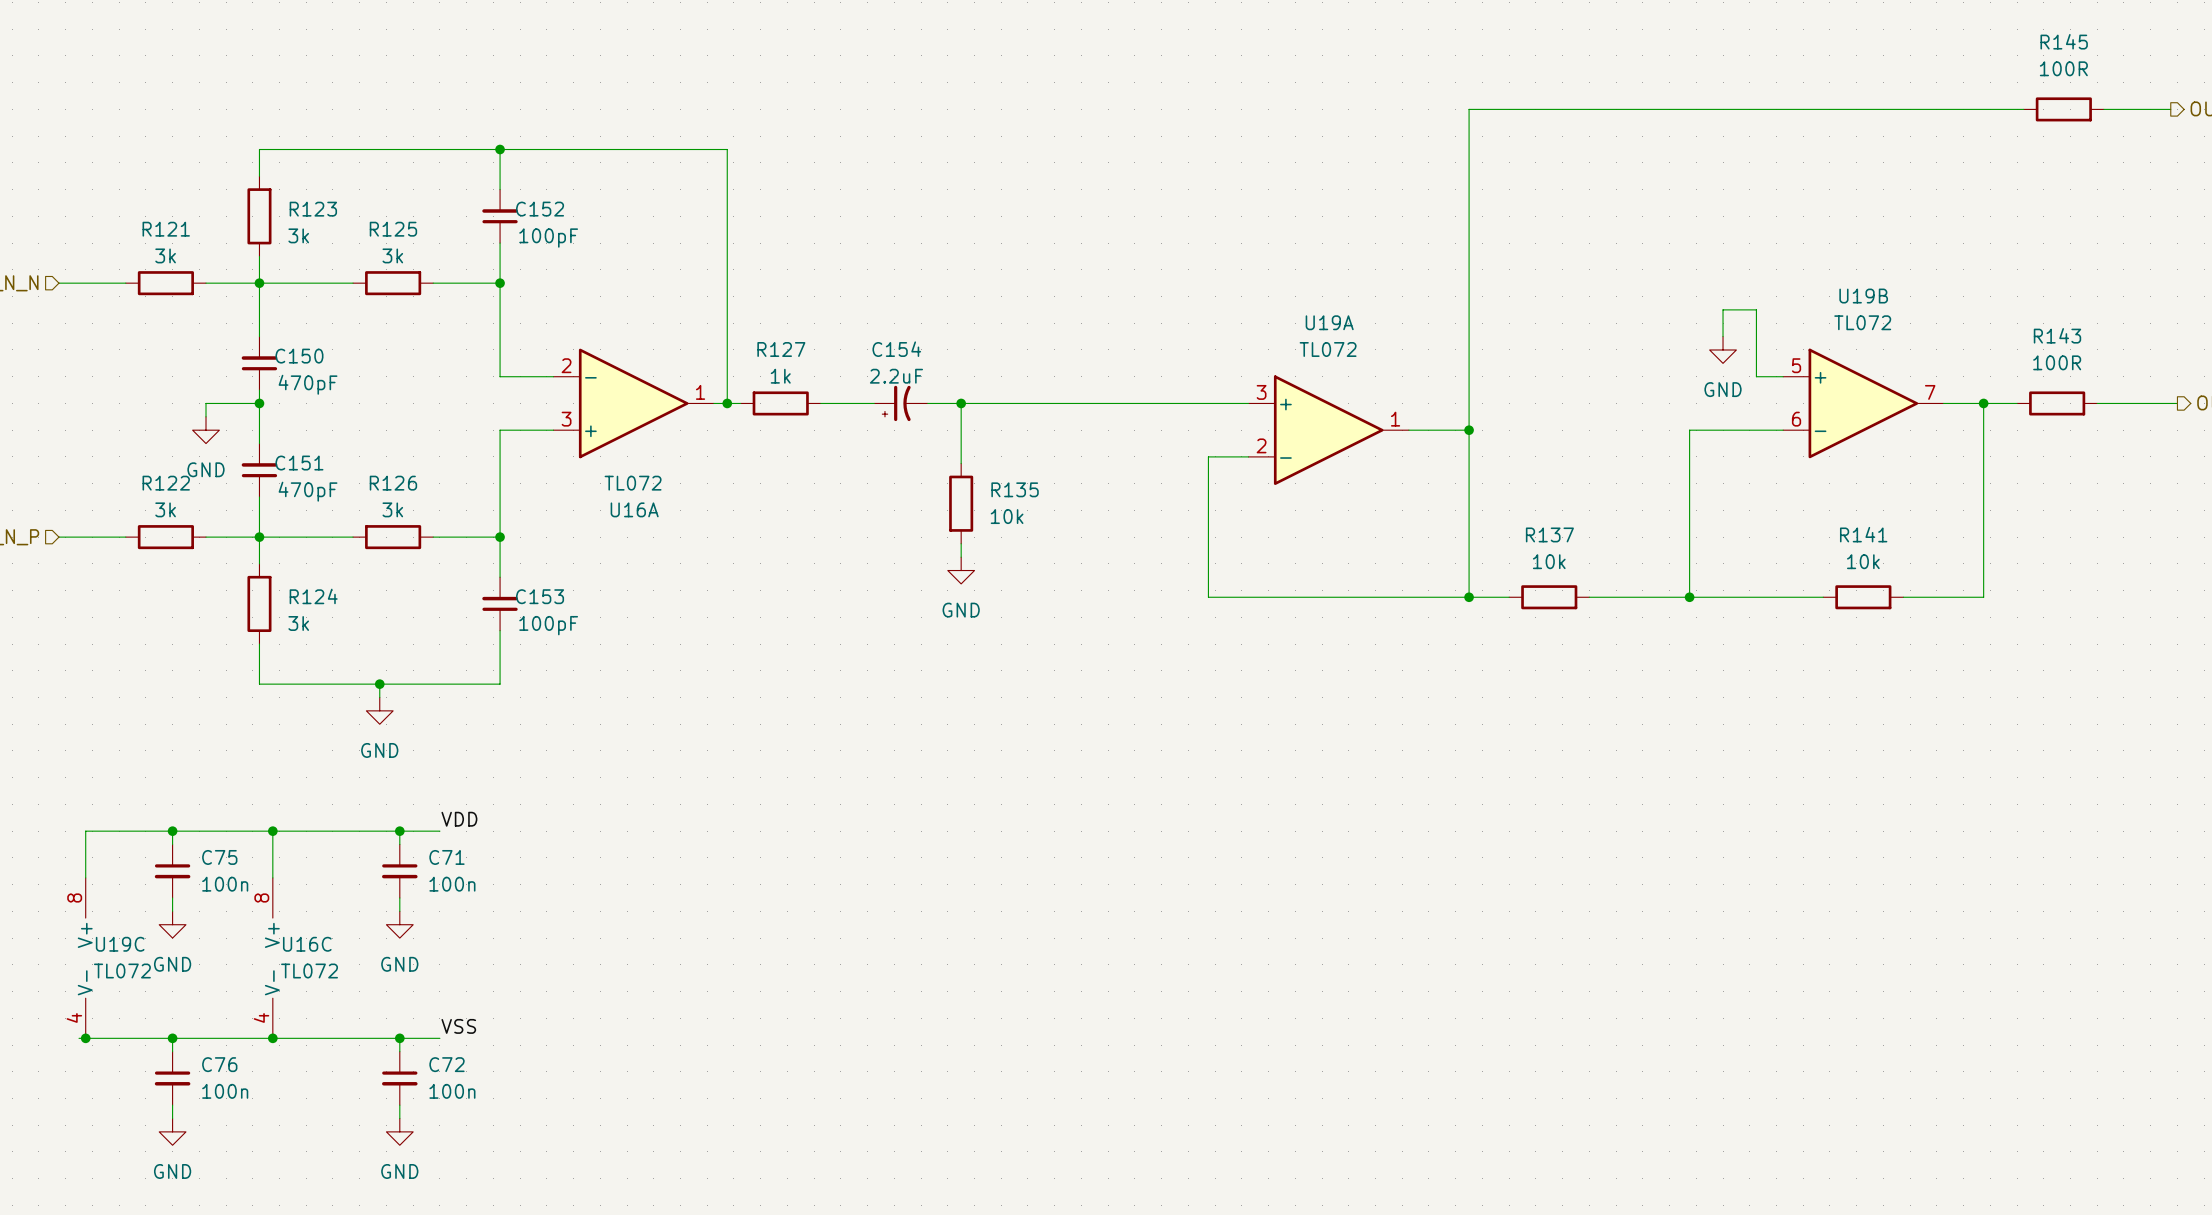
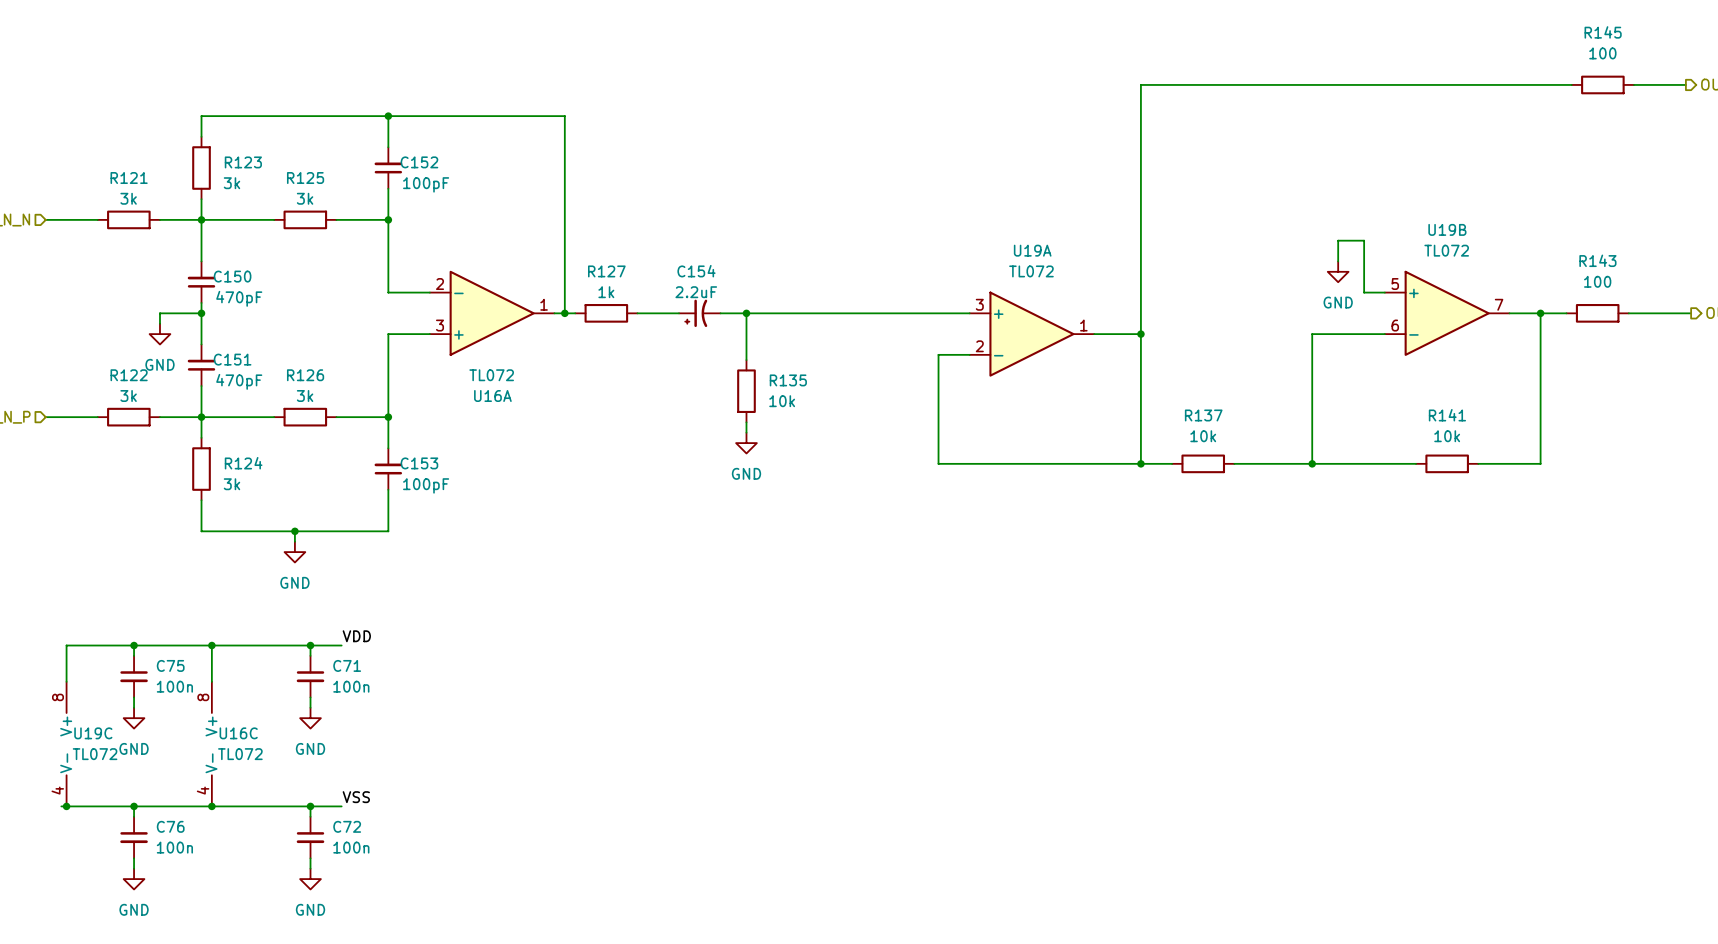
R145 value: 100R (2063, 68) -> 100 (1602, 53)
R143 value: 100R (2057, 362) -> 100 (1597, 281)

